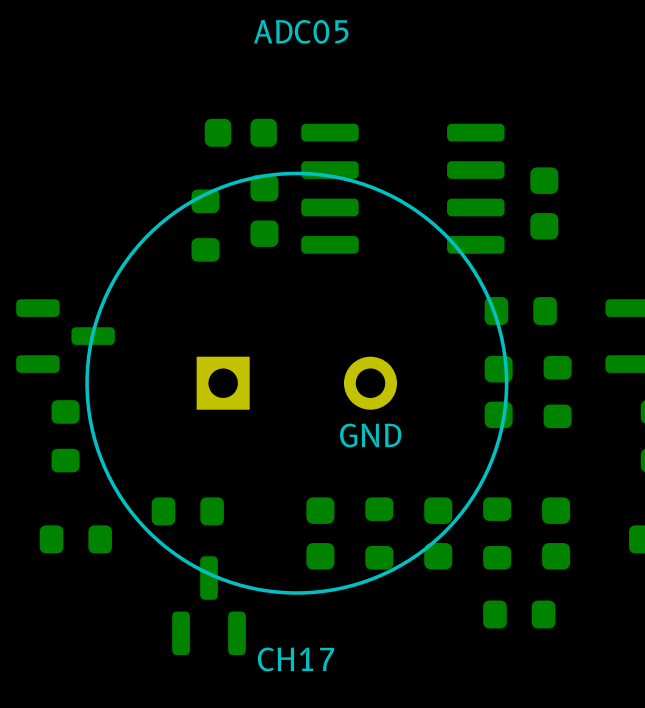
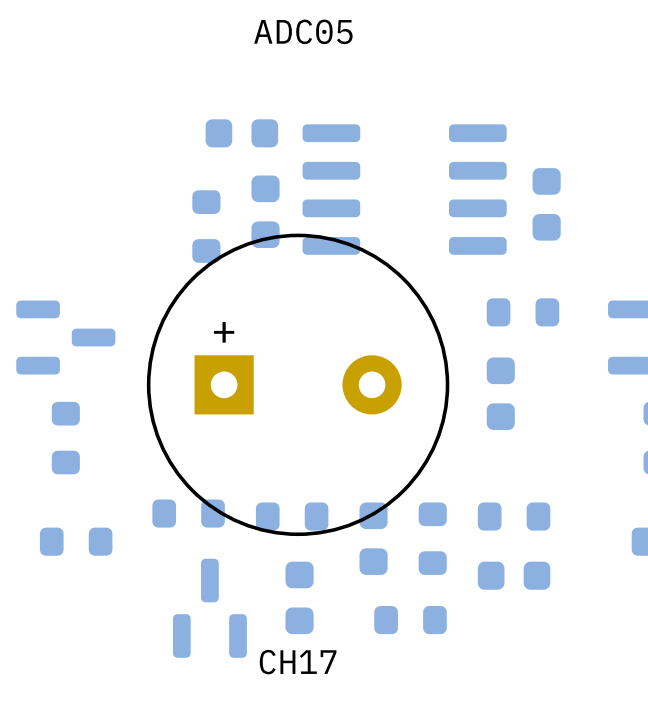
part footprint: [85, 171, 509, 595] -> [146, 233, 450, 537]
part: (557, 392) -> none
part footprint: [365, 497, 394, 570] -> [359, 502, 388, 575]
part footprint: [424, 497, 453, 570] -> [418, 502, 447, 575]
part: none -> (292, 516)
part position: (320, 533) -> (299, 597)
part rotation: 0° (497, 533) -> 90° clockwise (514, 516)
part rotation: 0° (556, 533) -> 90° clockwise (514, 575)
part position: (556, 533) -> (514, 575)
part: (519, 614) -> none
part: none -> (410, 620)

